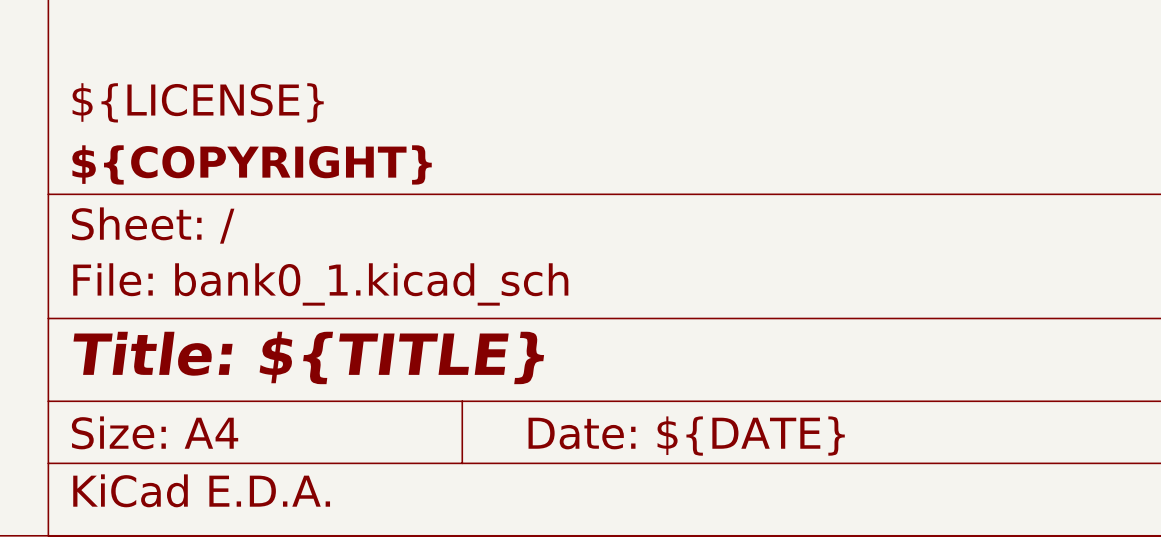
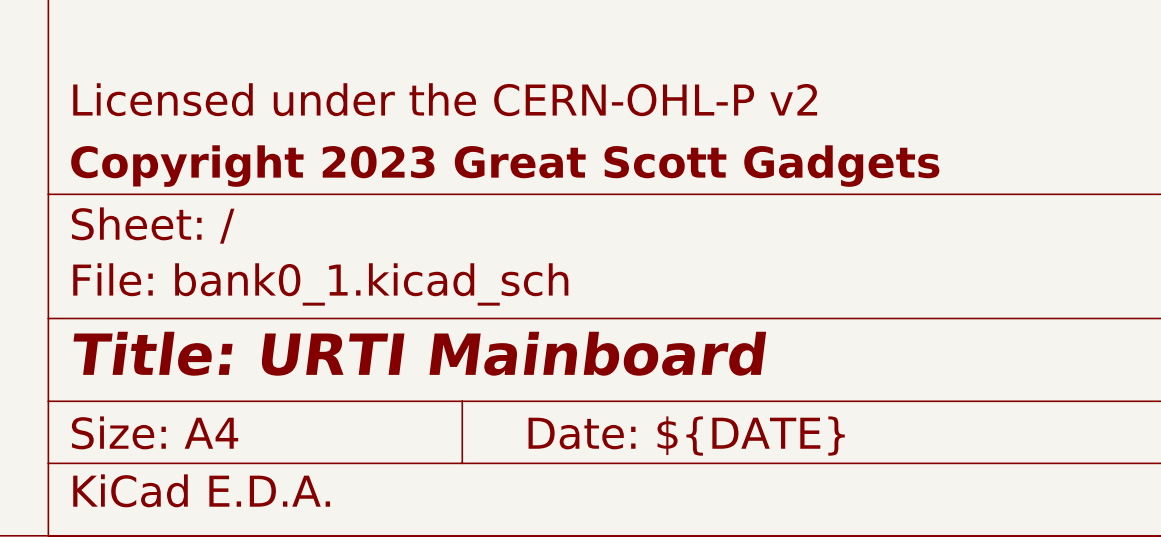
title block: ${LICENSE} (198, 102) -> Licensed under the CERN-OHL-P v2 (445, 99)
title block: ${COPYRIGHT} (252, 164) -> Copyright 2023 Great Scott Gadgets (505, 166)
title block: Title: ${TITLE} (308, 357) -> Title: URTI Mainboard (419, 353)

